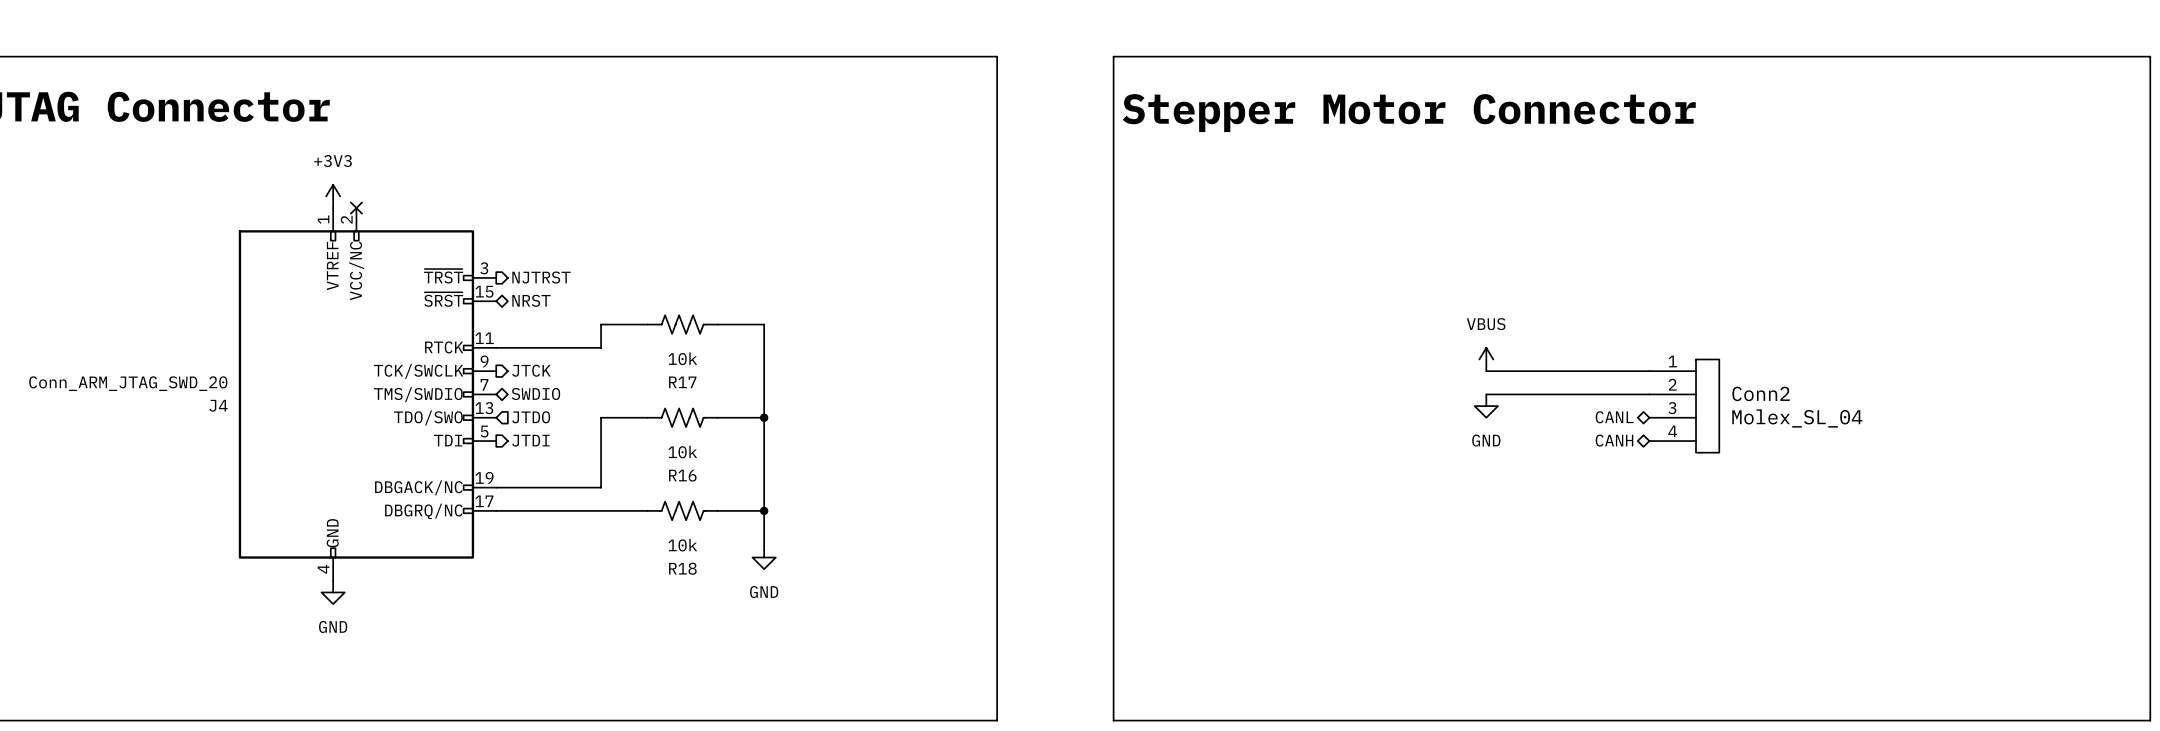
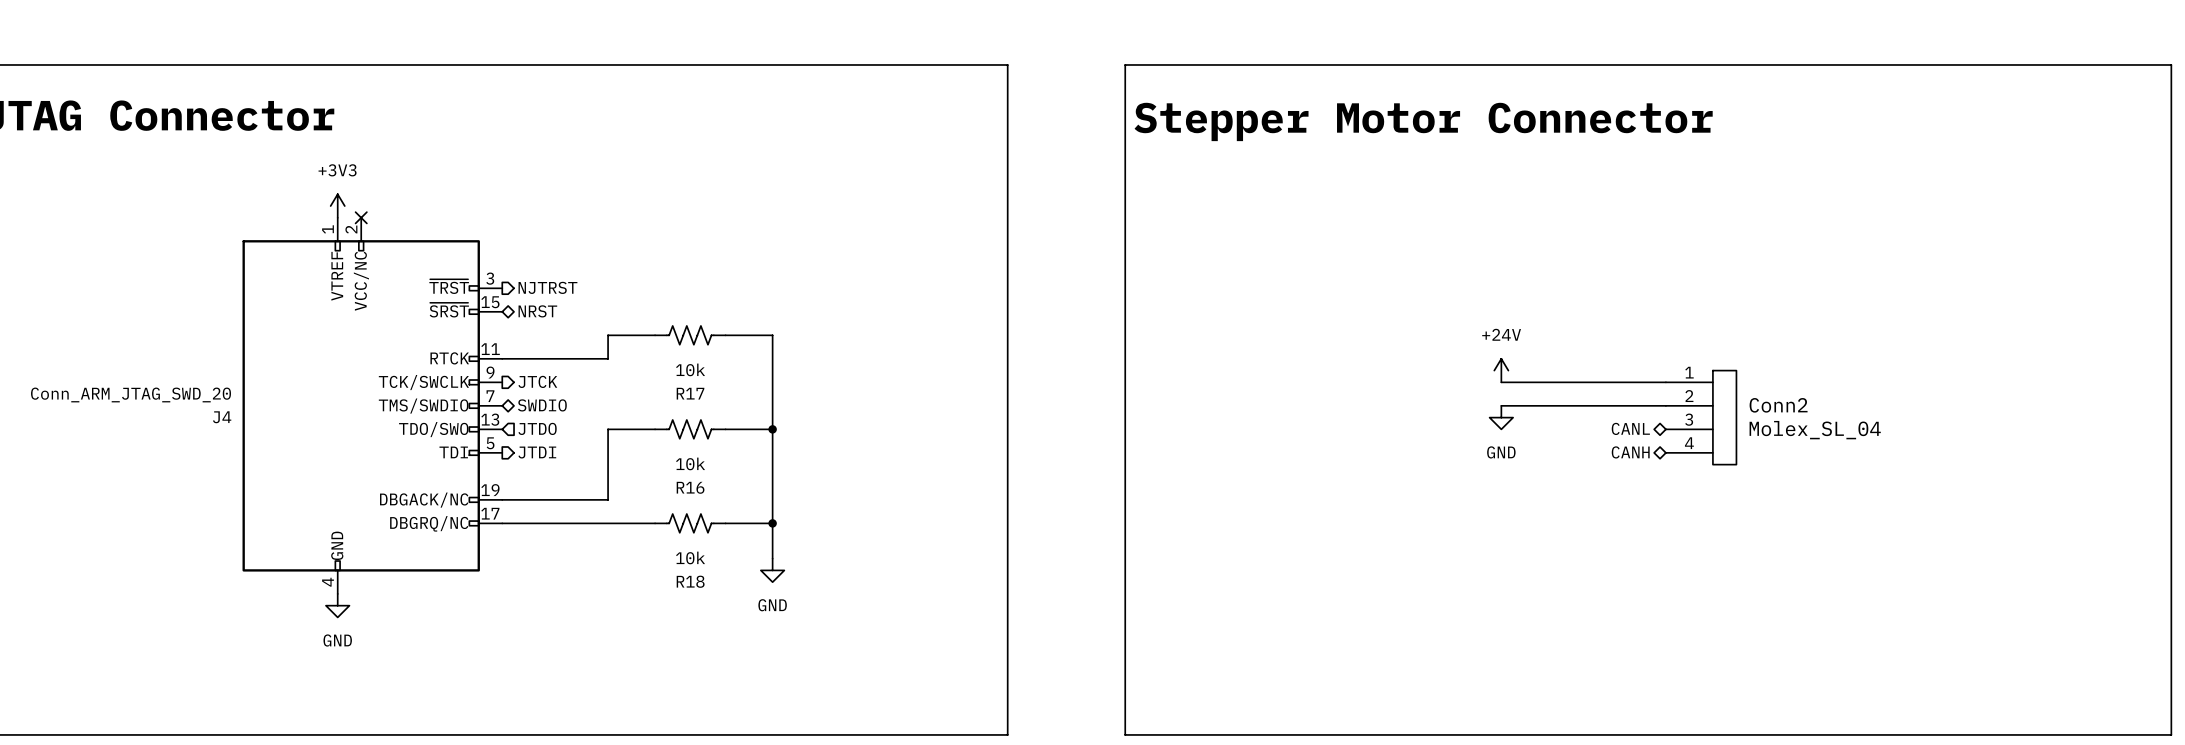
power symbol: VBUS (1486, 359) -> +24V (1501, 370)

